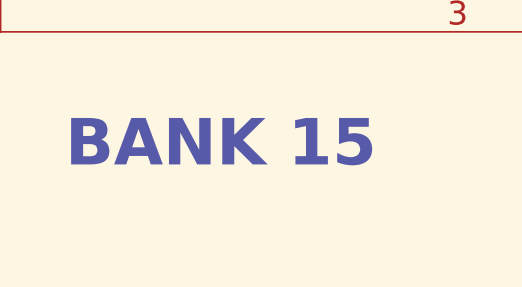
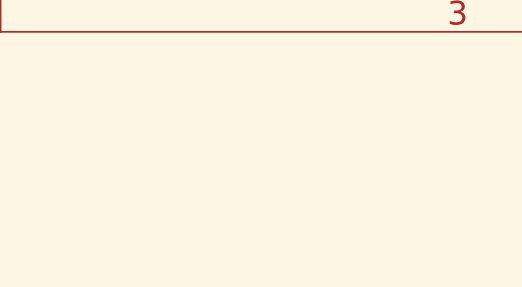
text: BANK 15 (221, 141) -> none

